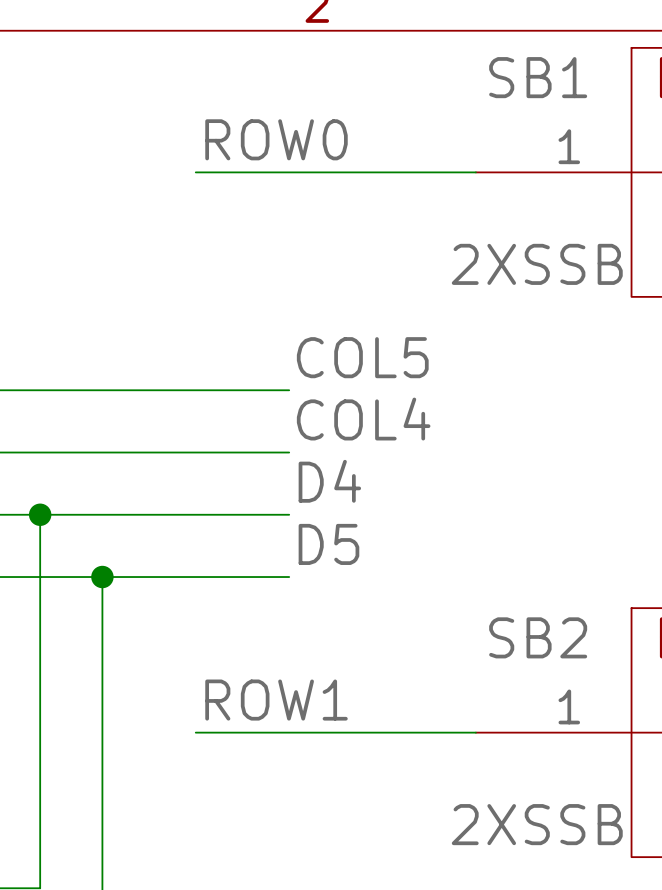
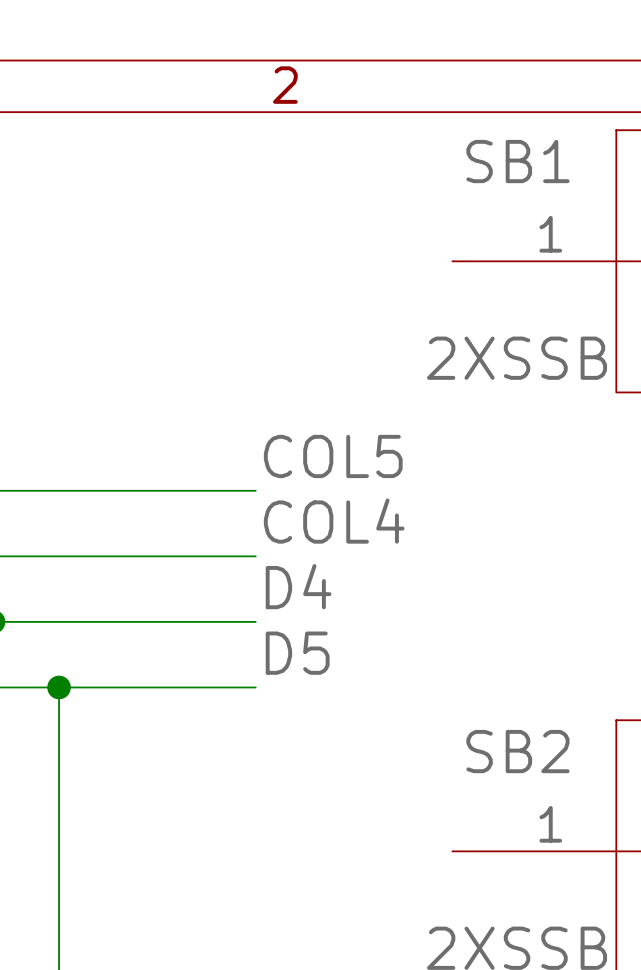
label: ROW0 (276, 139) -> none
wire: (195, 172) (475, 172) -> none
label: ROW1 (276, 700) -> none
wire: (195, 732) (475, 732) -> none

